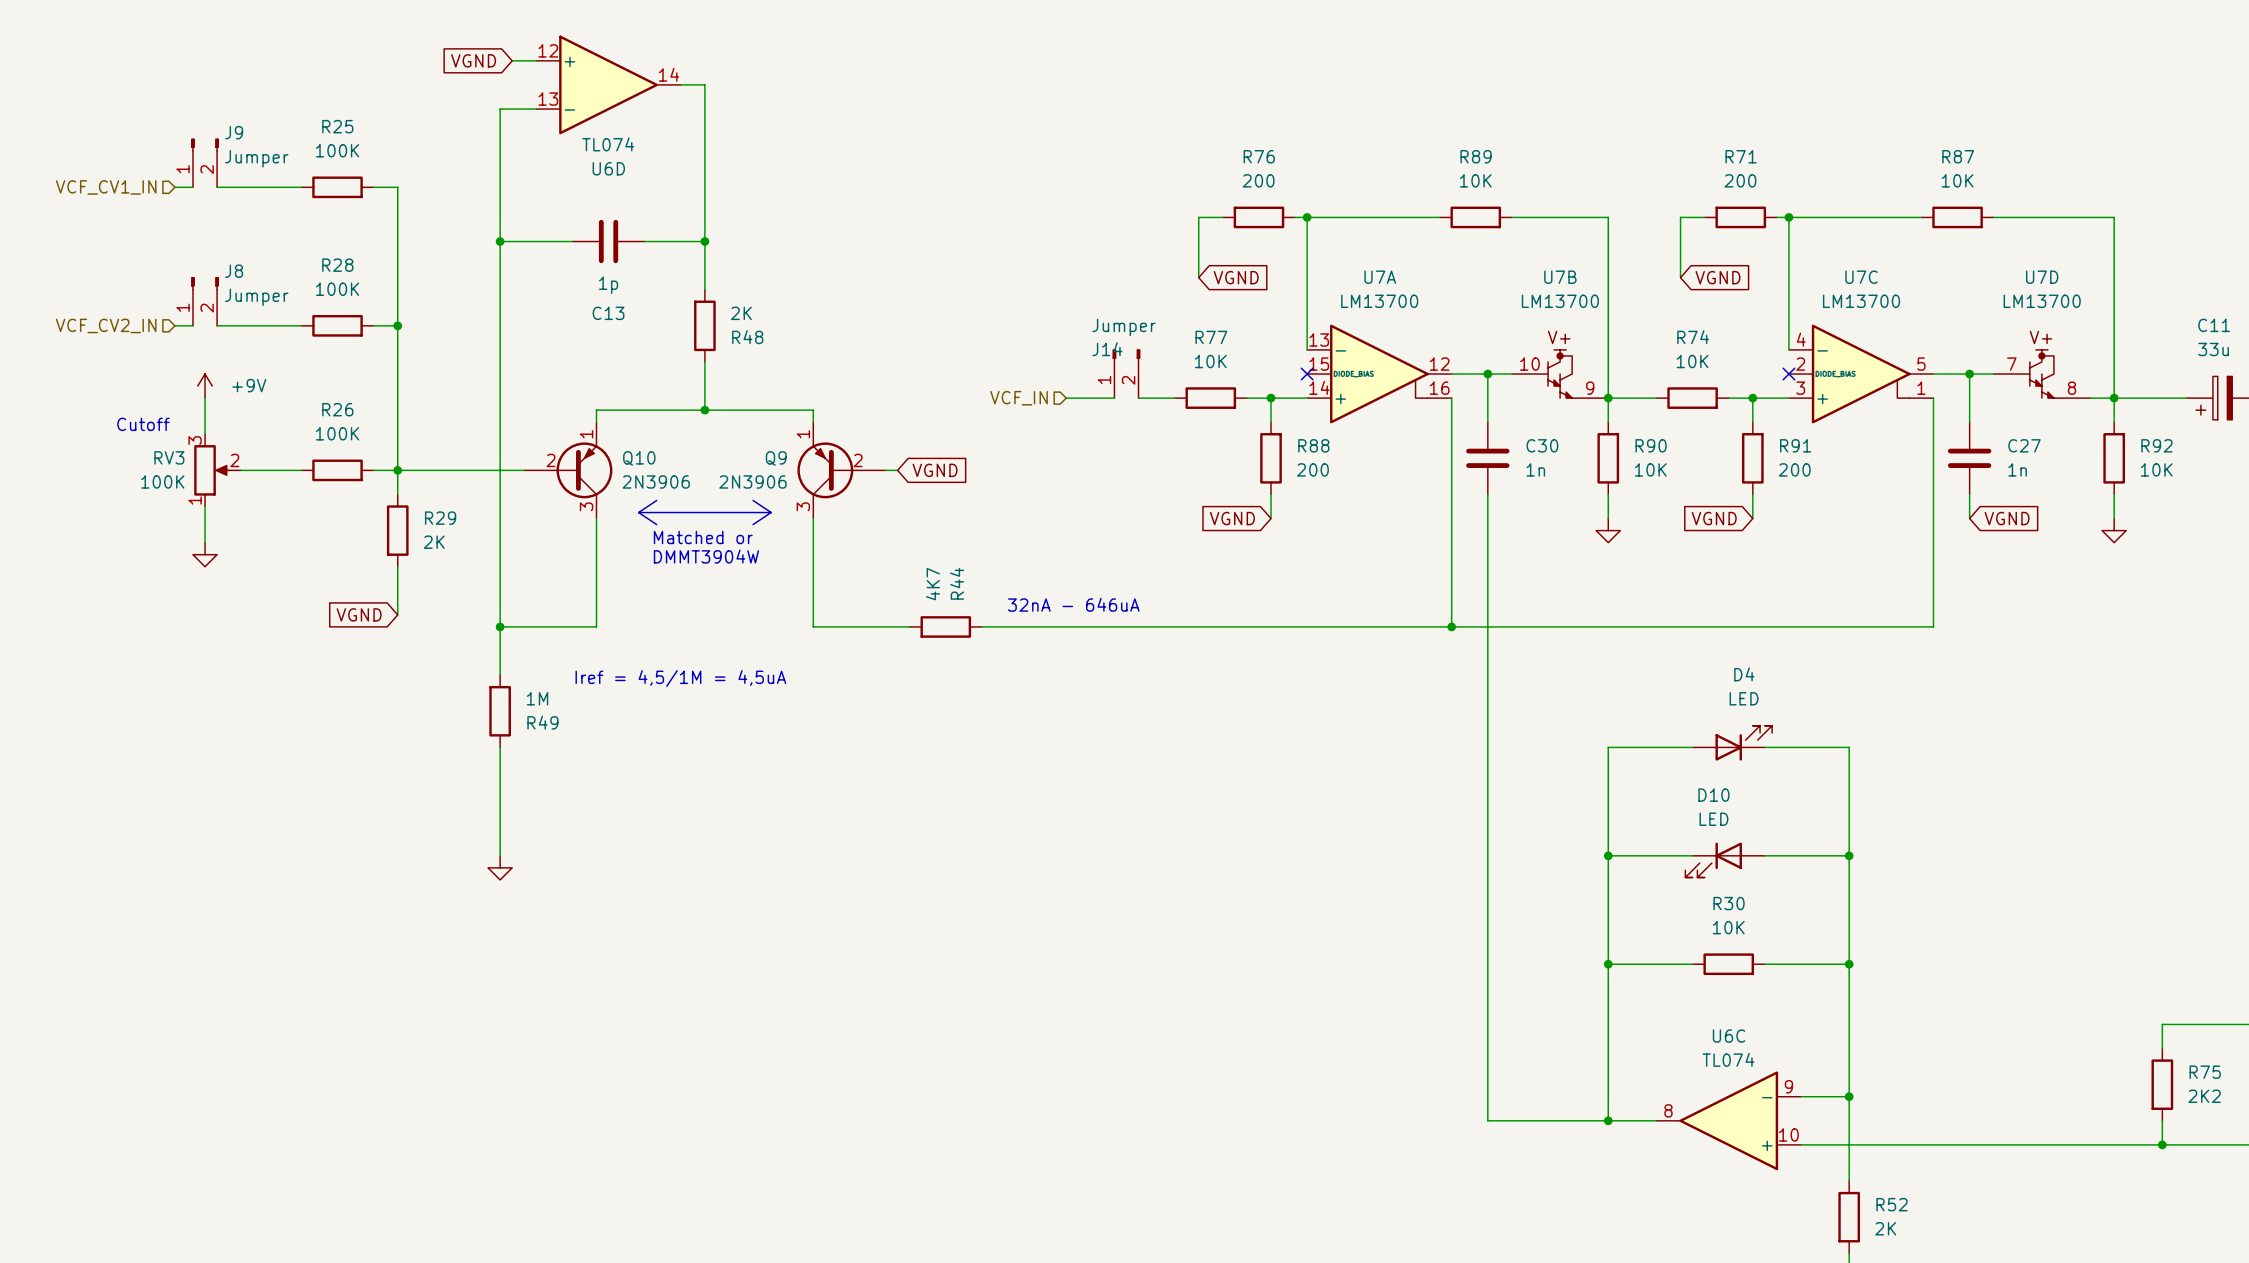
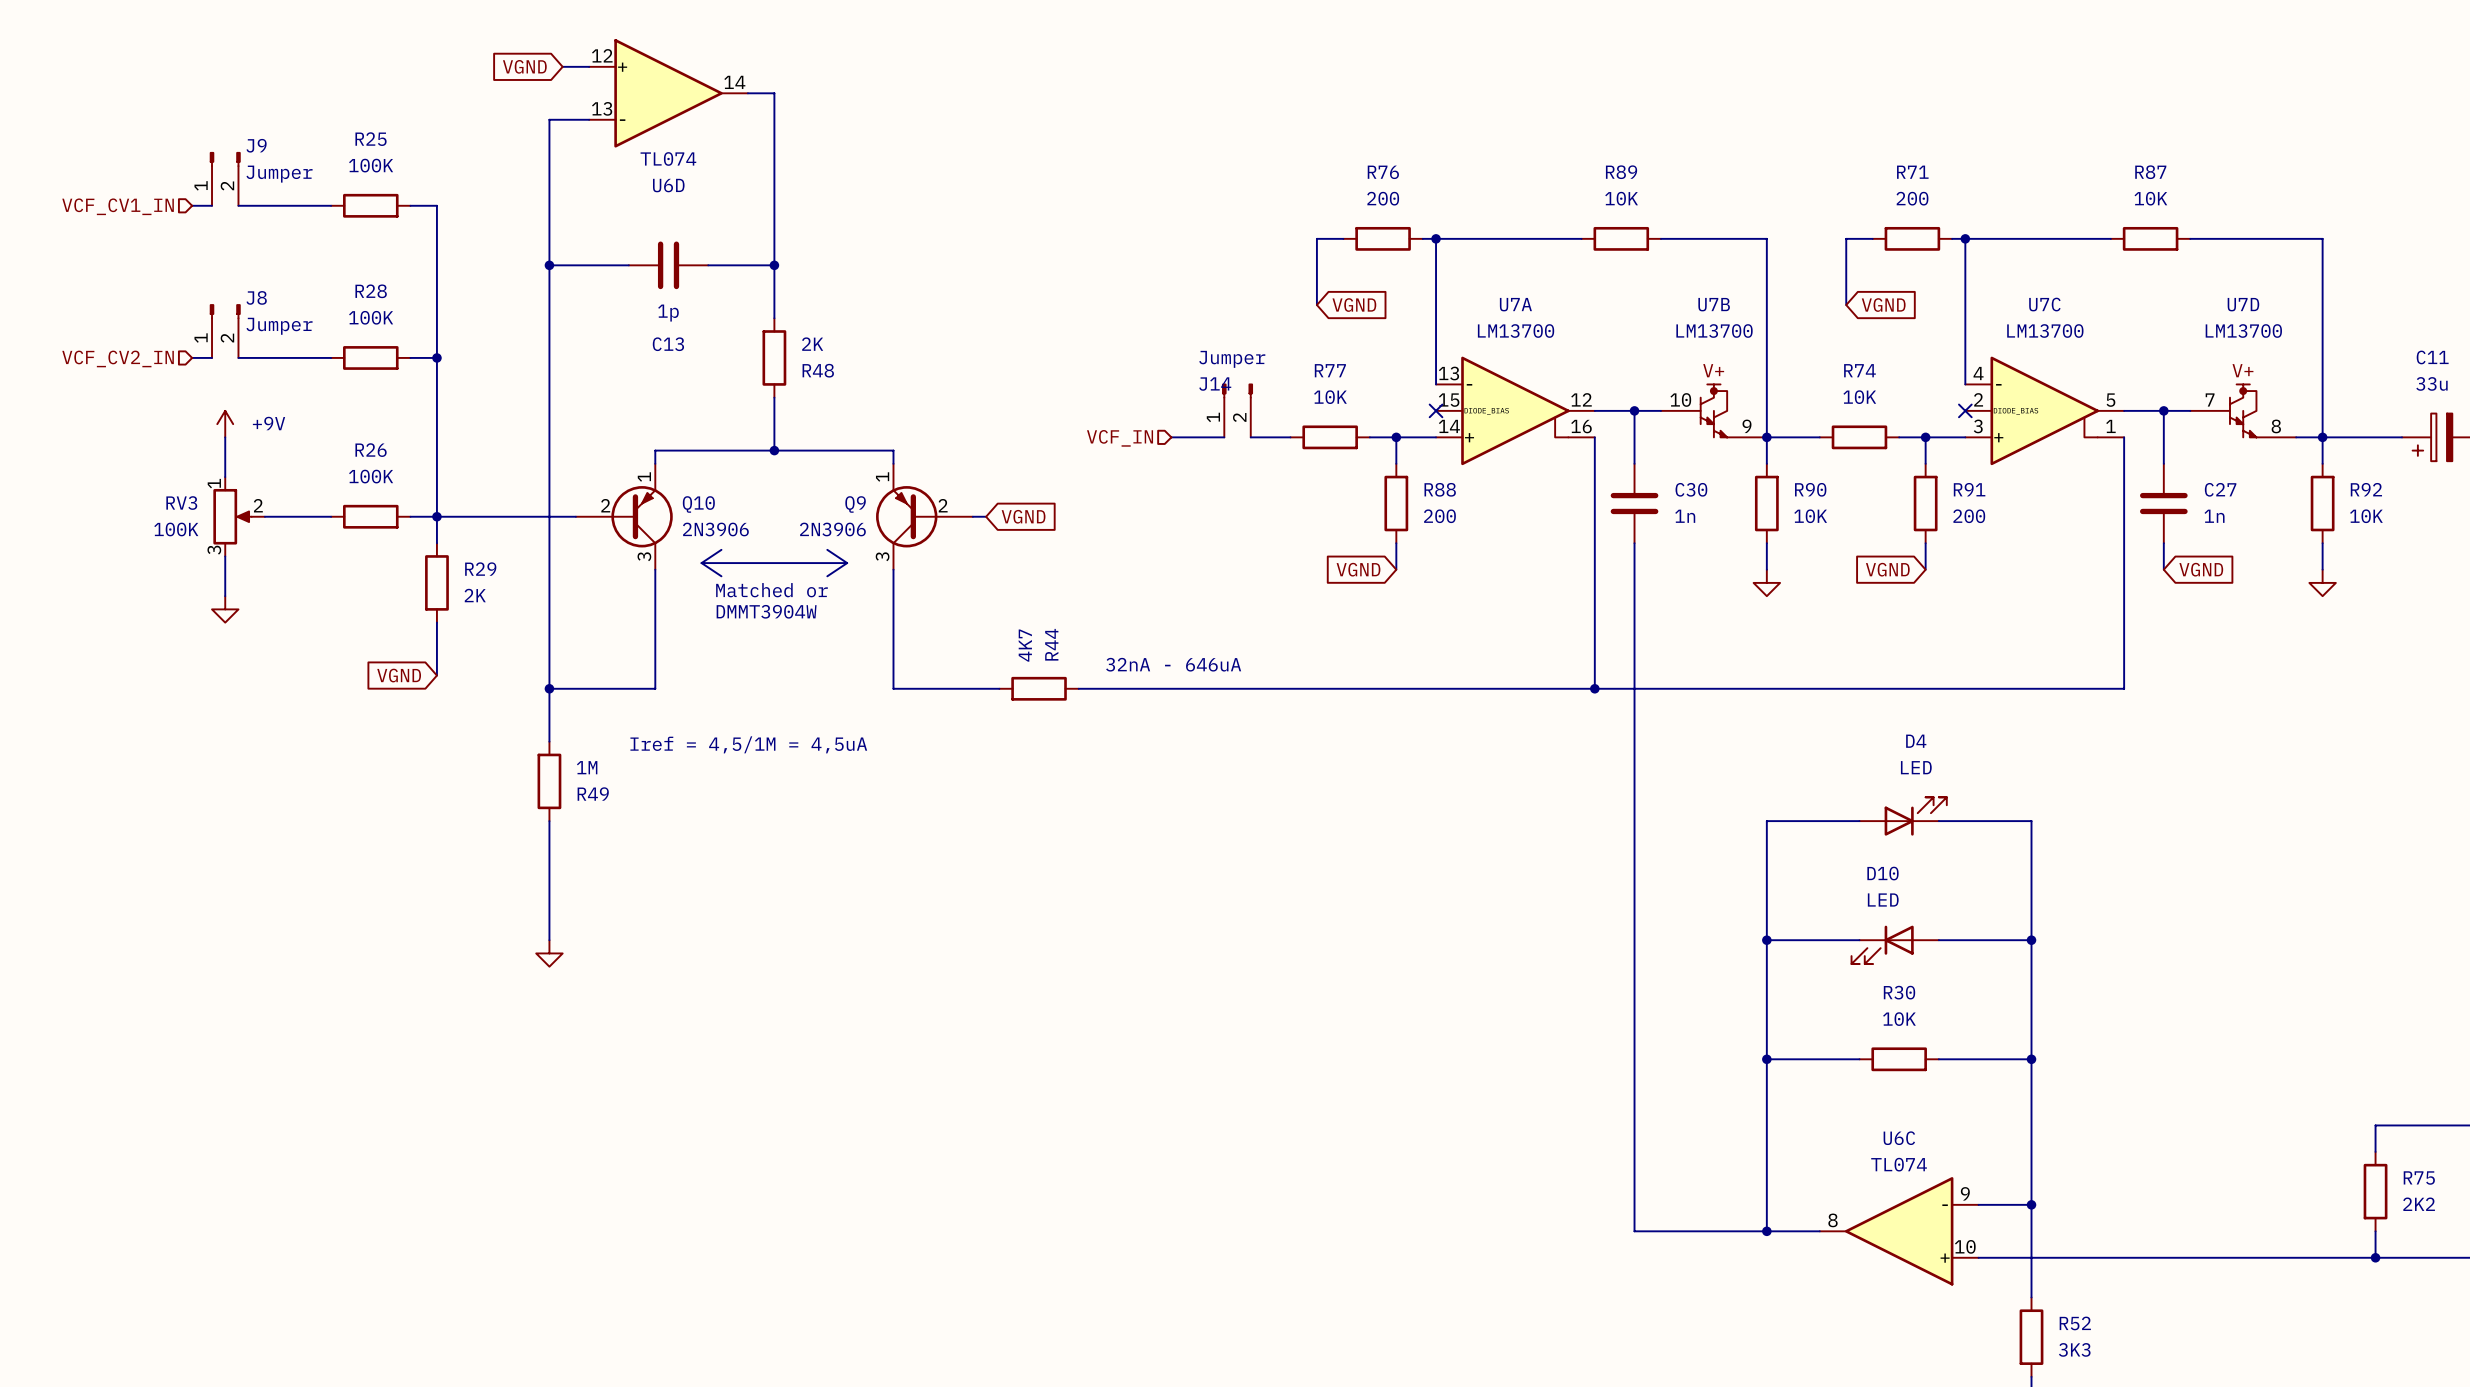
text: Cutoff (143, 424) -> none
RV3 flip: as is (211, 470) -> up-down (232, 516)
R52 value: 2K (1885, 1228) -> 3K3 (2074, 1349)

